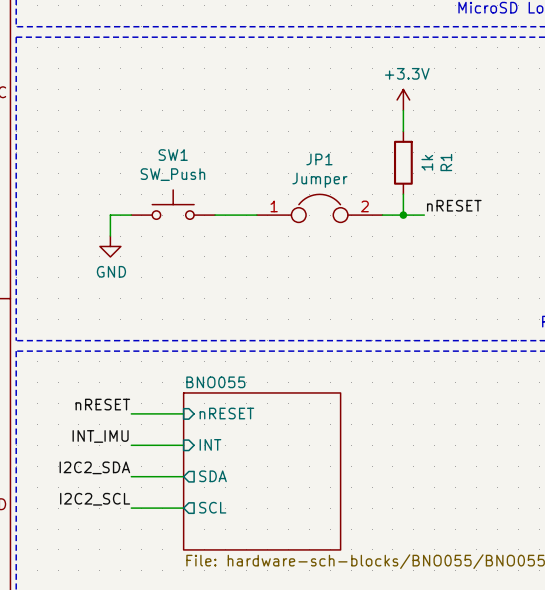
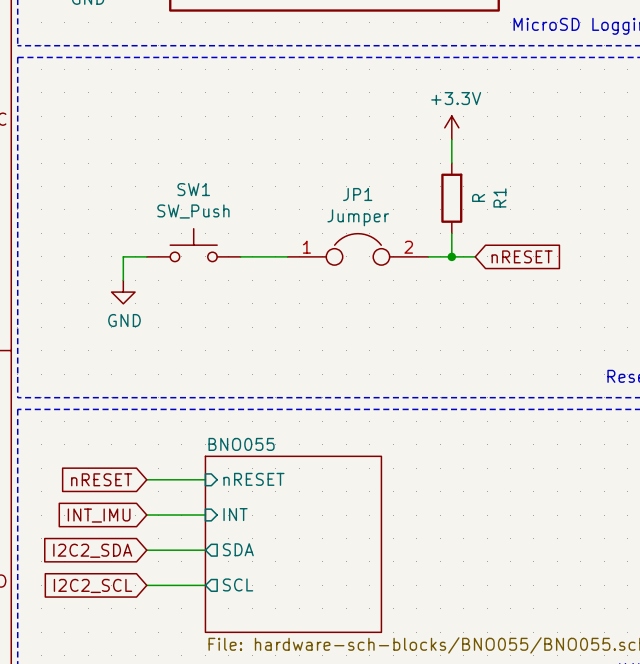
R1 value: 1k (427, 162) -> R (478, 197)
label: nRESET (454, 205) -> none
global label: none -> nRESET (522, 256)
label: nRESET (102, 404) -> none
global label: none -> nRESET (101, 479)
label: INT_IMU (100, 436) -> none
global label: none -> INT_IMU (99, 515)
label: I2C2_SDA (94, 467) -> none
global label: none -> I2C2_SDA (92, 550)
label: I2C2_SCL (95, 499) -> none
global label: none -> I2C2_SCL (92, 585)

